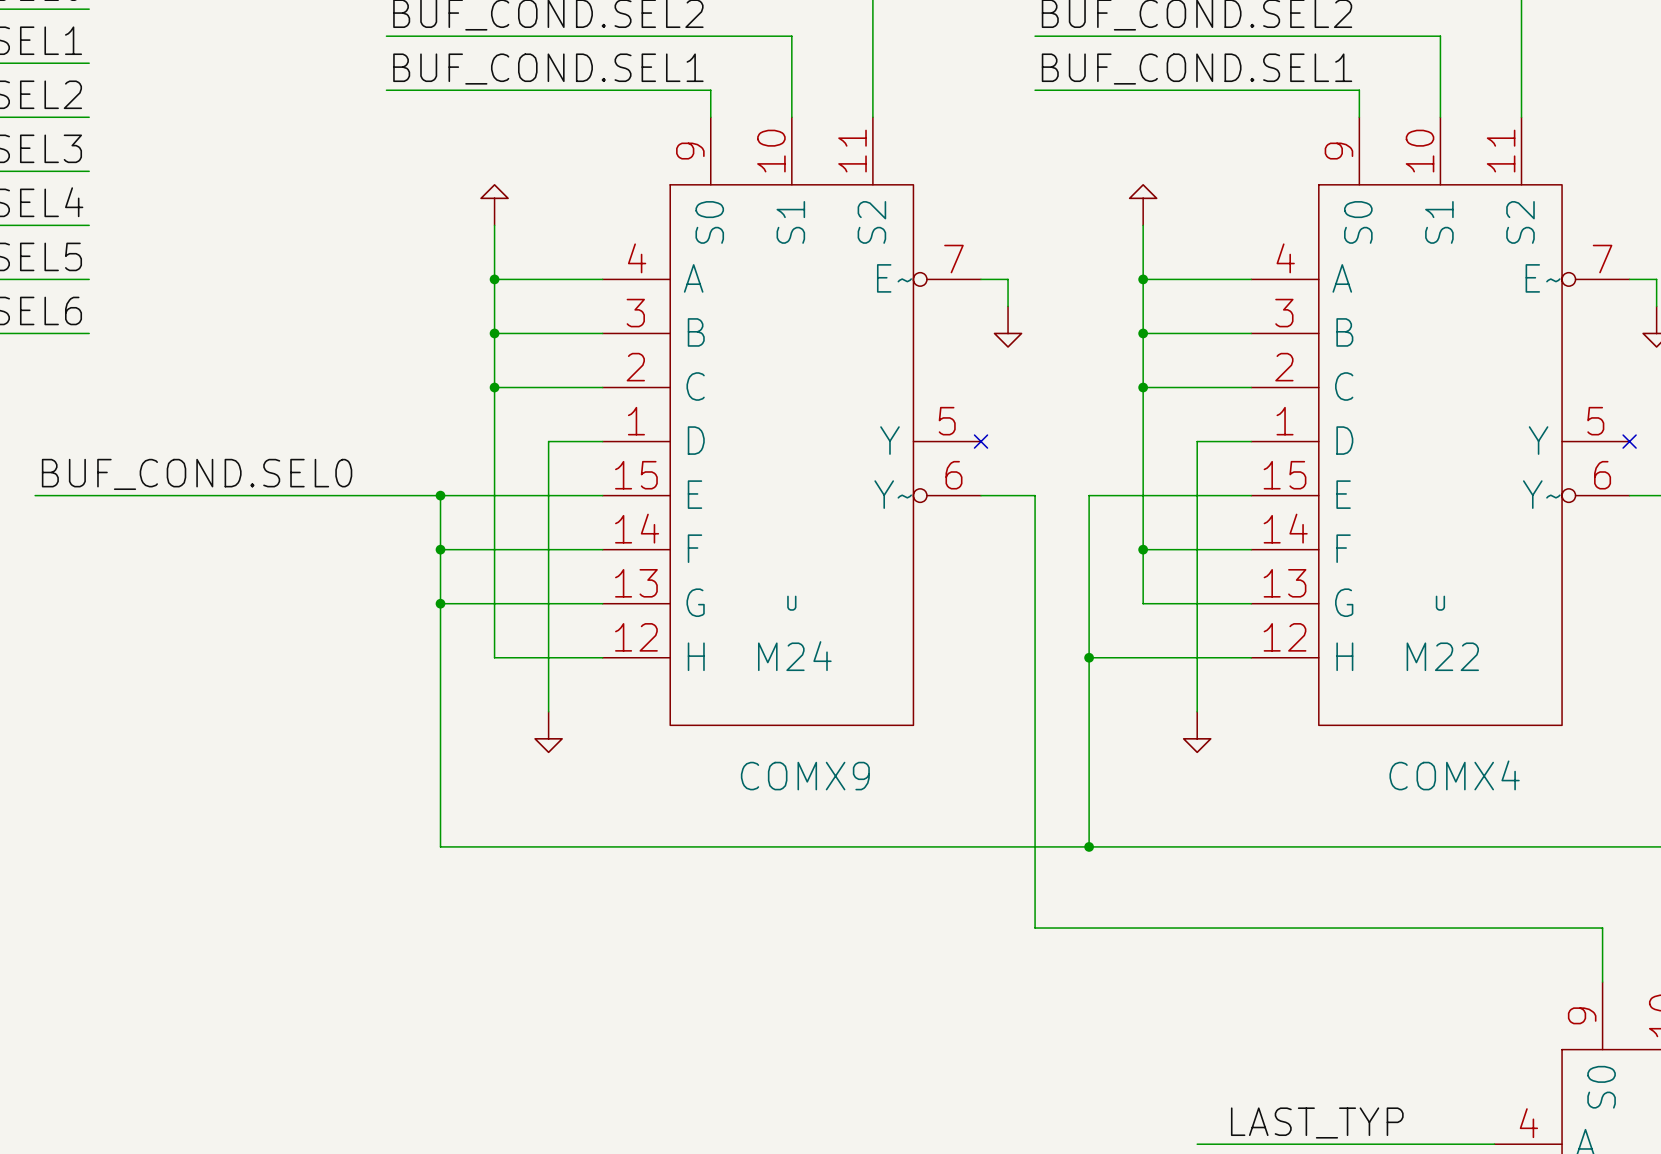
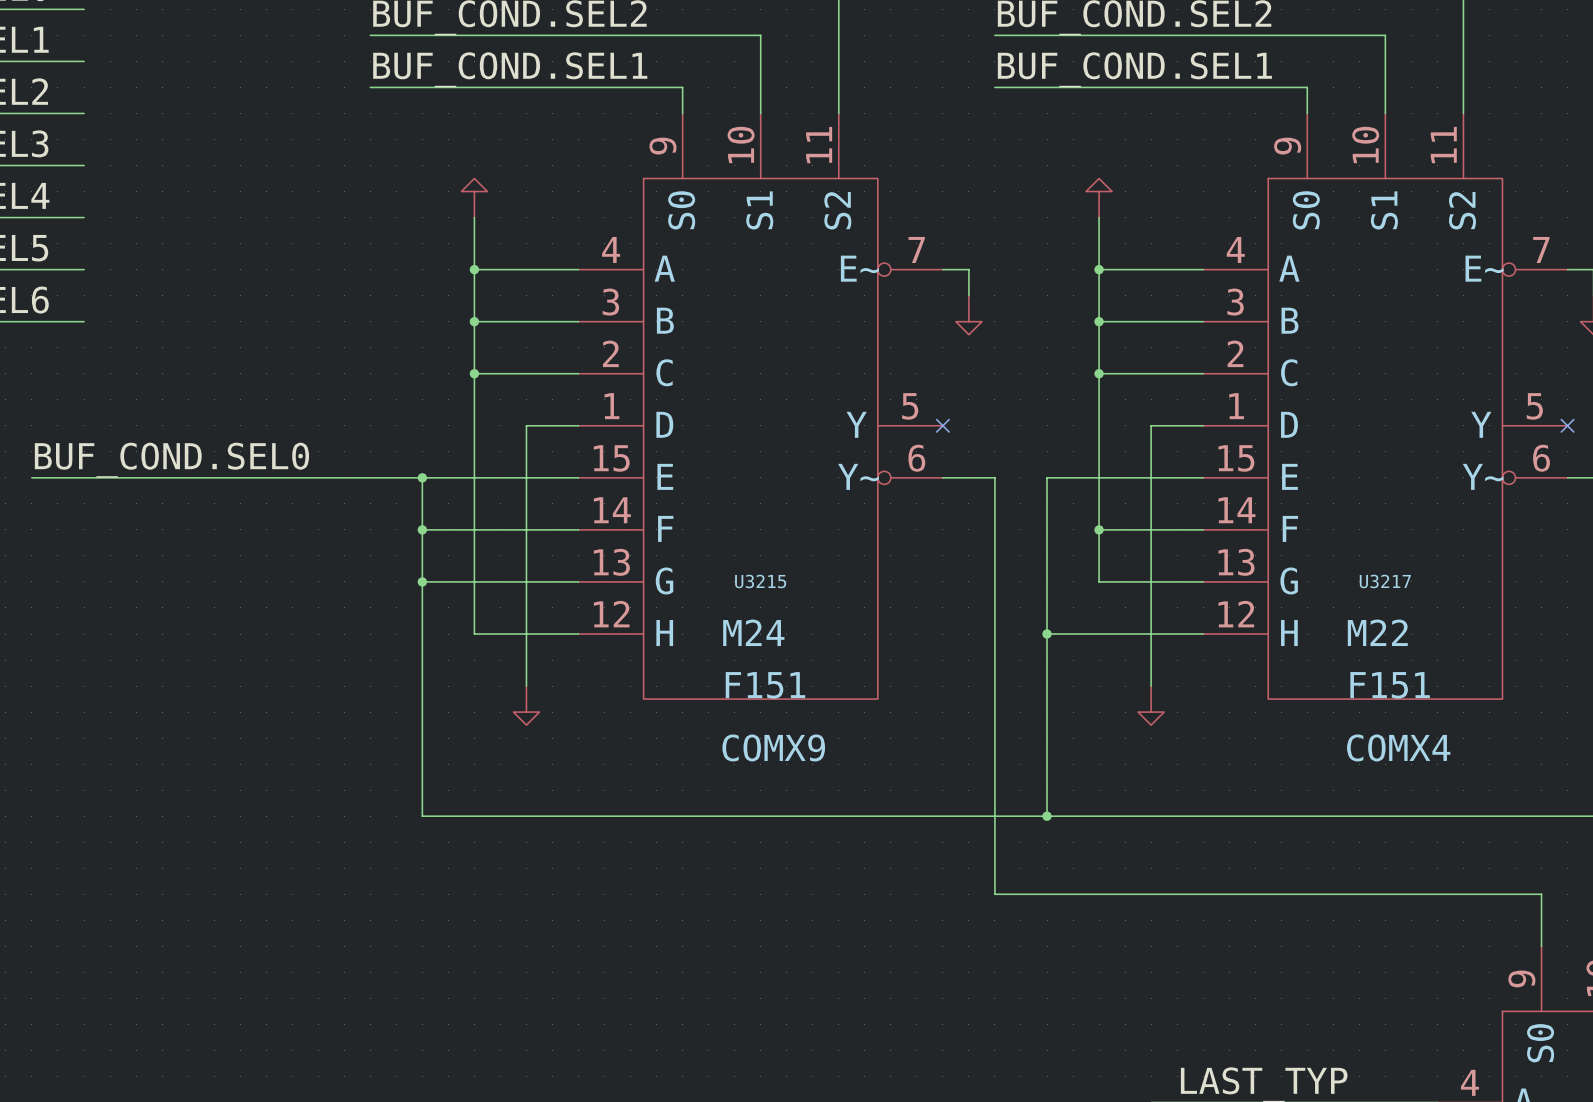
U name: U (791, 603) -> U3215 (760, 581)
U name: U (1440, 603) -> U3217 (1385, 581)
U value: none -> F151 (765, 685)
U value: none -> F151 (1390, 685)

